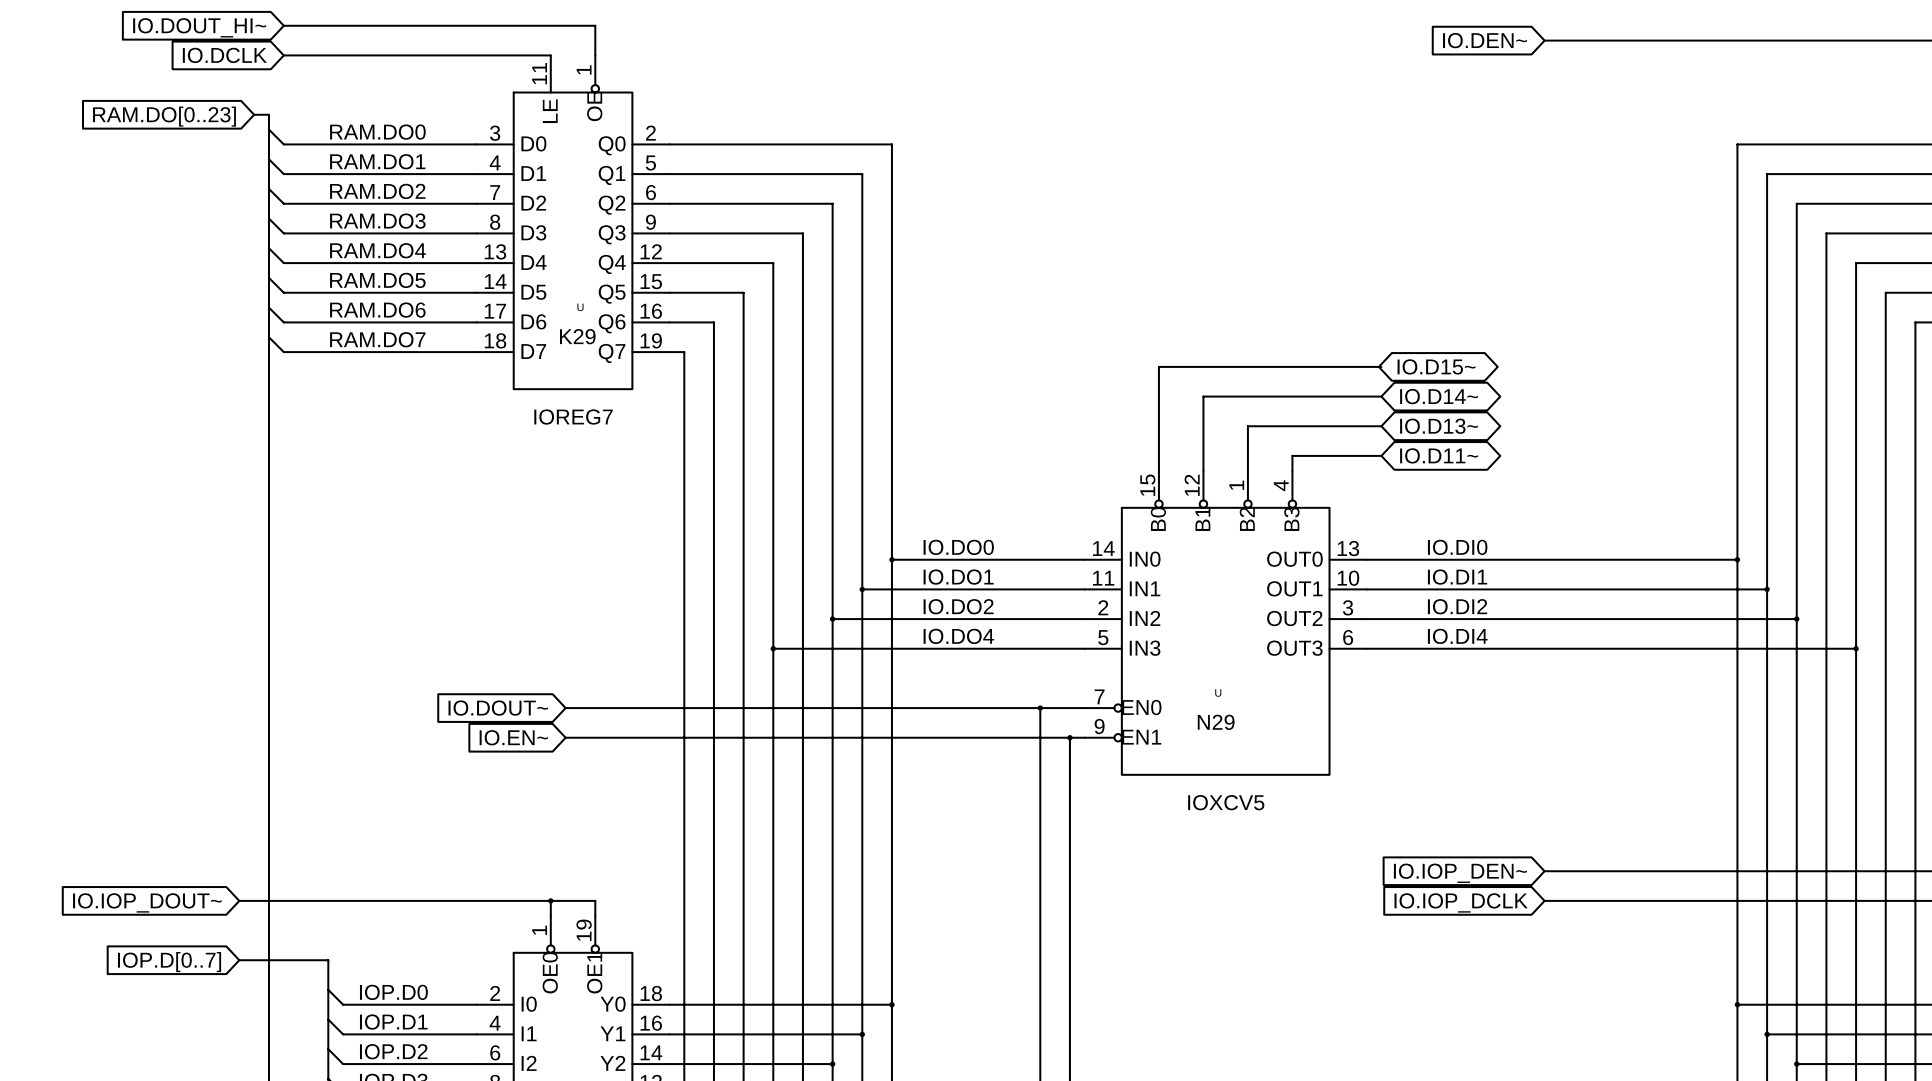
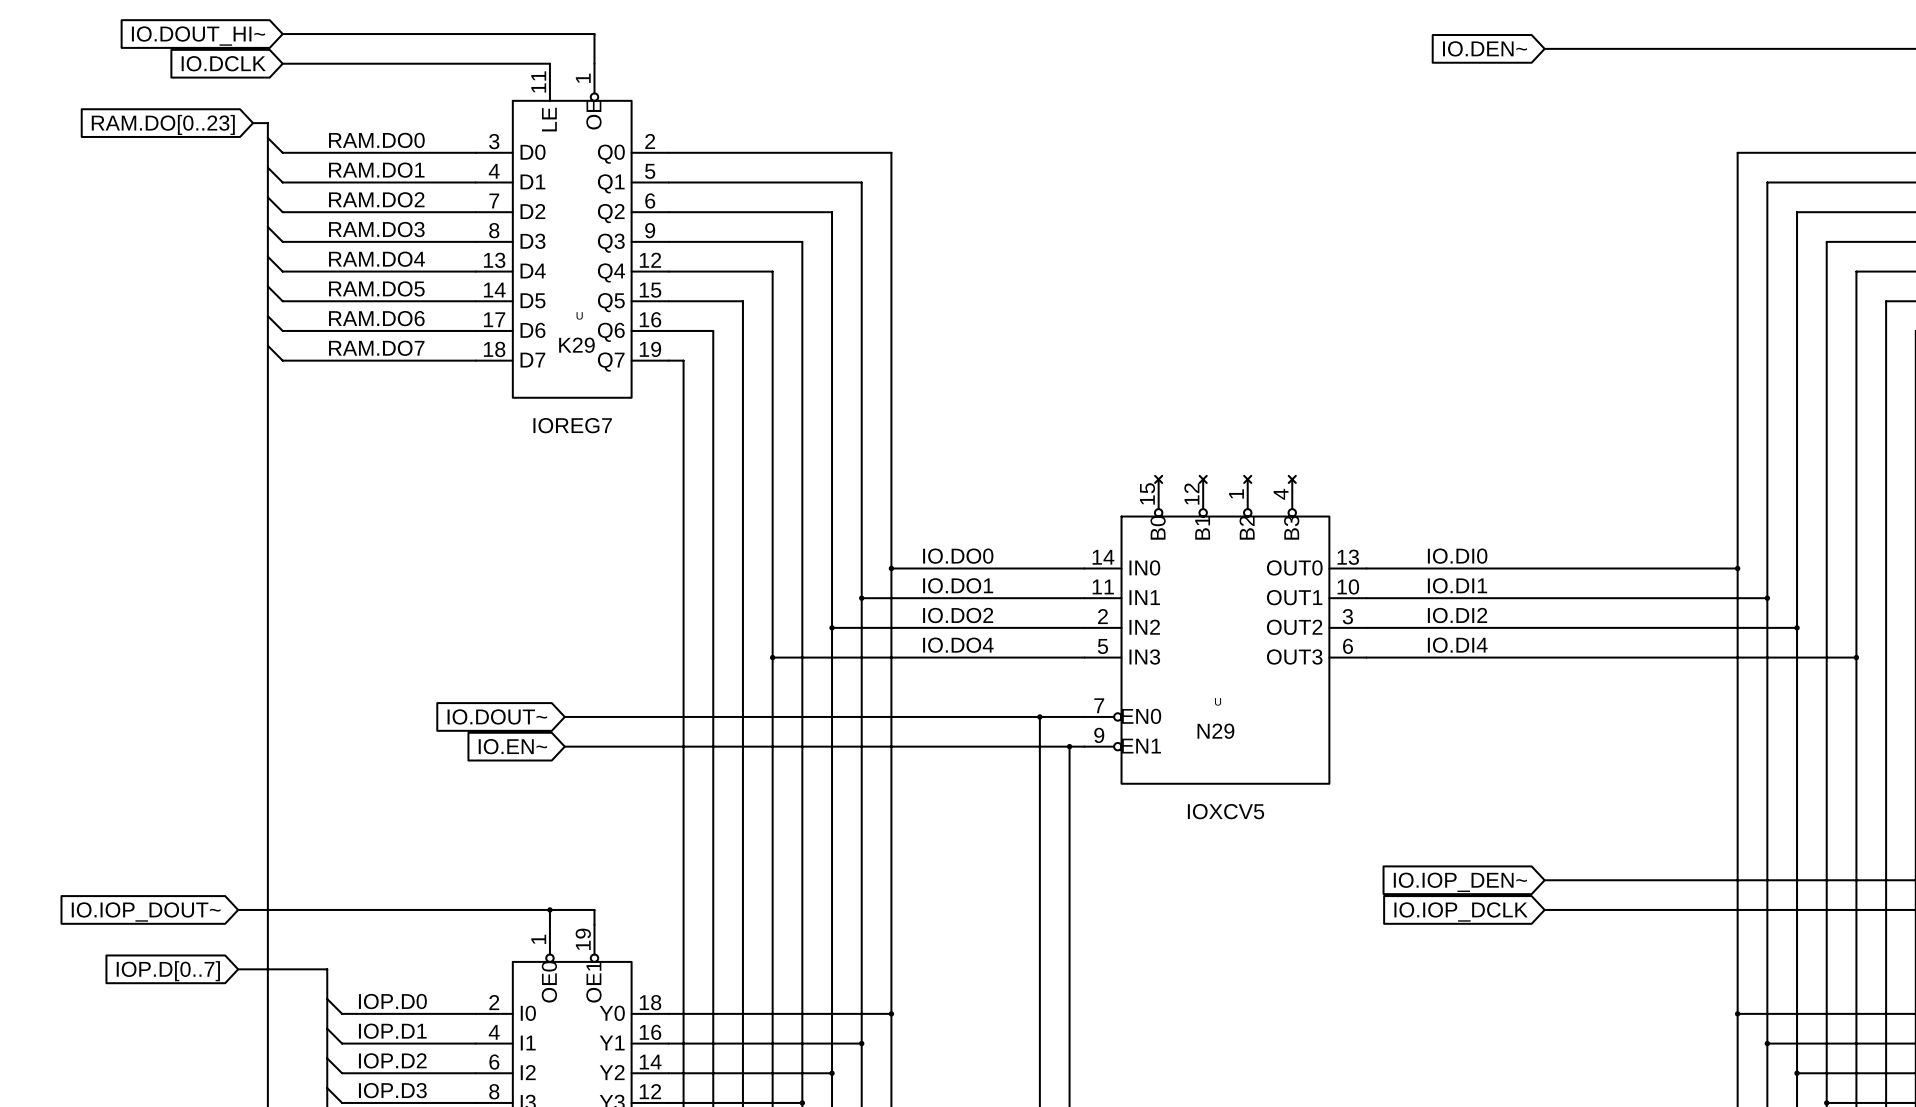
wire: (1381, 366) (1158, 366) (1158, 470) -> none
global label: IO.D15~ (1436, 366) -> none
wire: (1381, 396) (1203, 396) (1203, 470) -> none
global label: IO.D14~ (1439, 396) -> none
wire: (1381, 426) (1247, 426) (1247, 470) -> none
global label: IO.D13~ (1439, 426) -> none
wire: (1381, 455) (1292, 455) (1292, 470) -> none
global label: IO.D11~ (1439, 455) -> none
no-connect mark: none -> (1158, 479)
no-connect mark: none -> (1203, 479)
no-connect mark: none -> (1247, 479)
no-connect mark: none -> (1292, 479)

